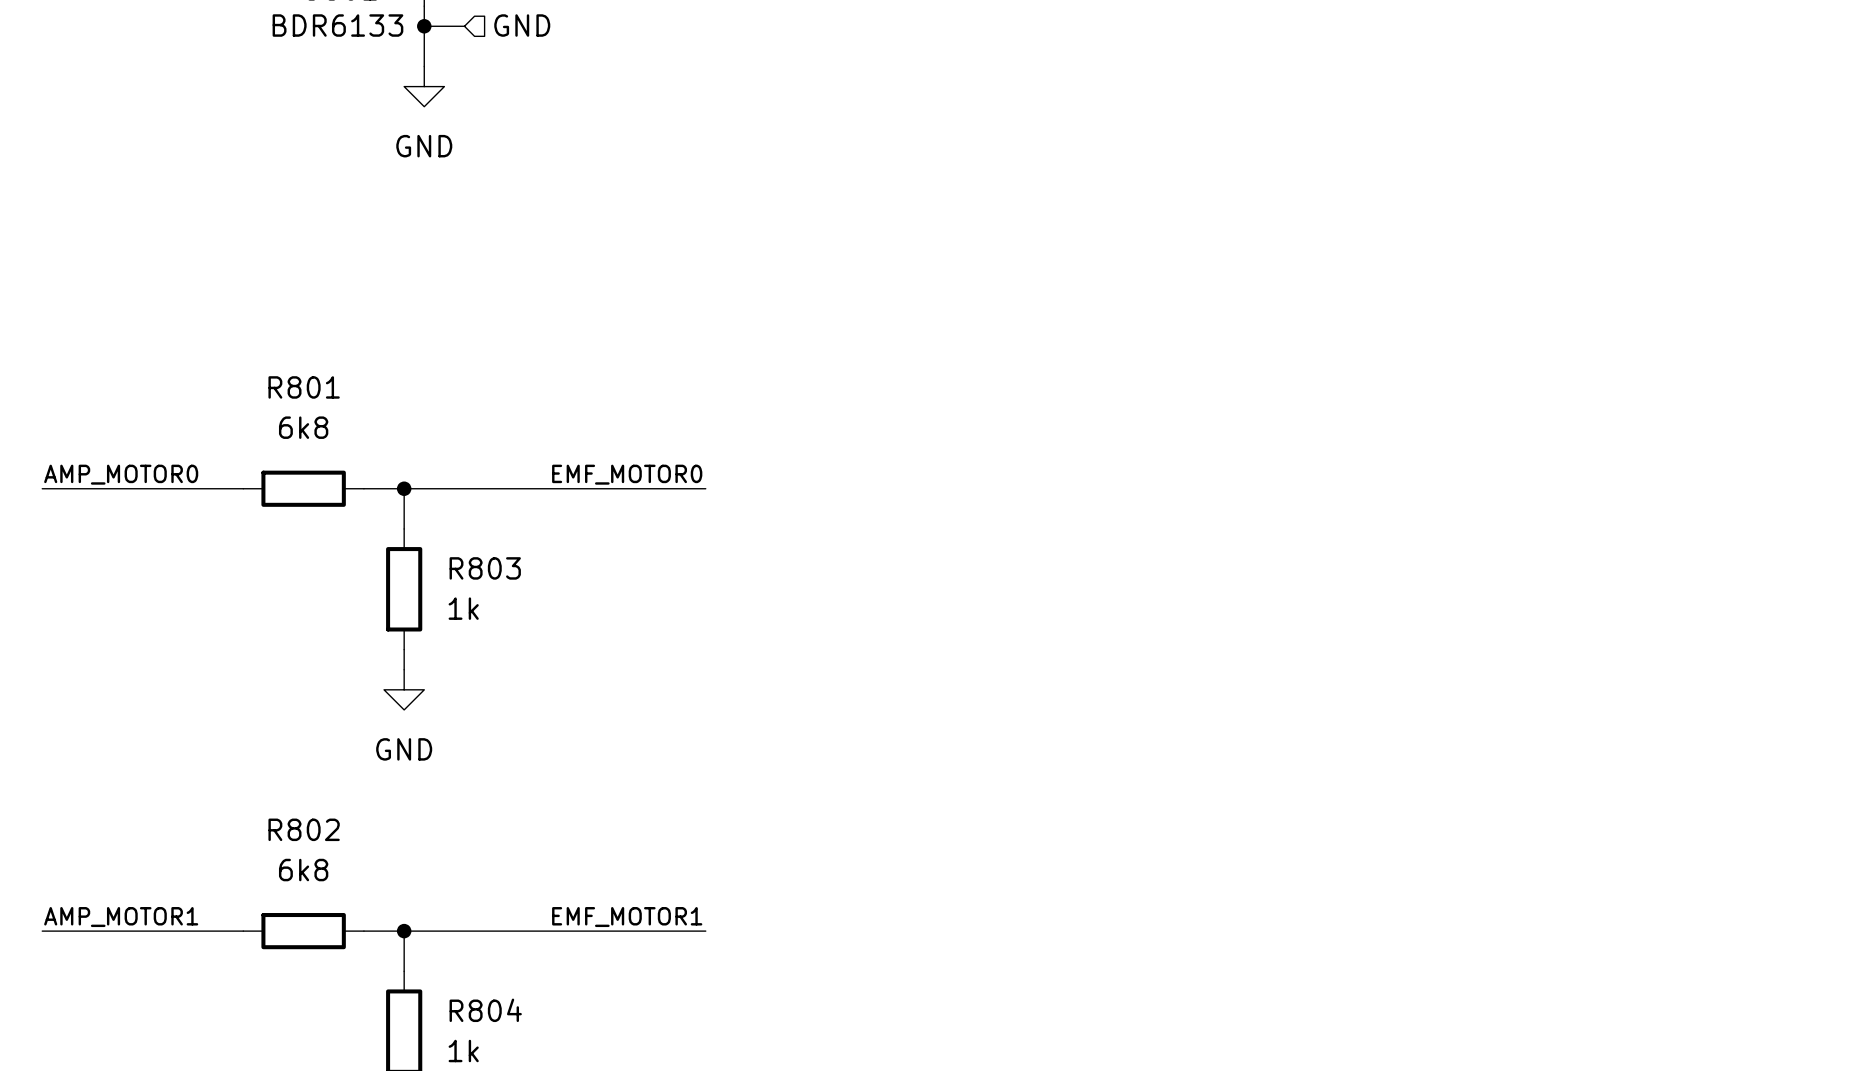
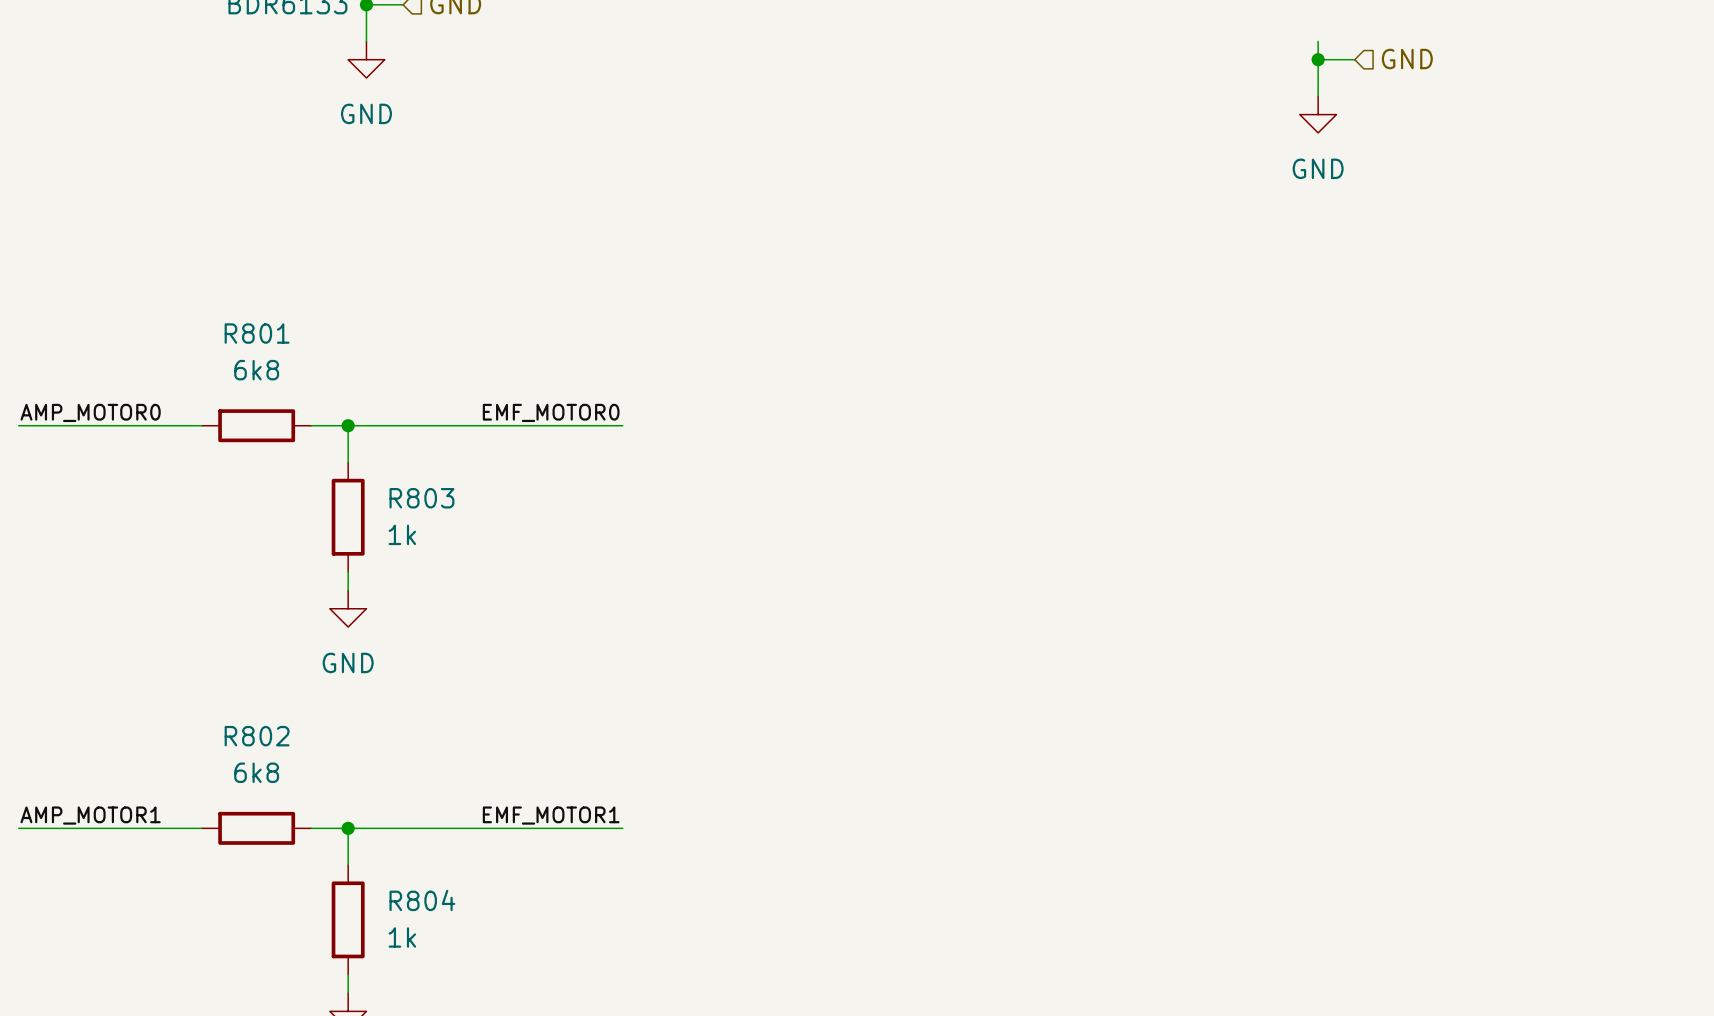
wire: none -> (1318, 41) (1318, 96)
hierarchical label: none -> GND (1407, 59)
wire: none -> (1318, 59) (1354, 59)
junction: none -> (1318, 59)
power symbol: none -> GND (1318, 114)

